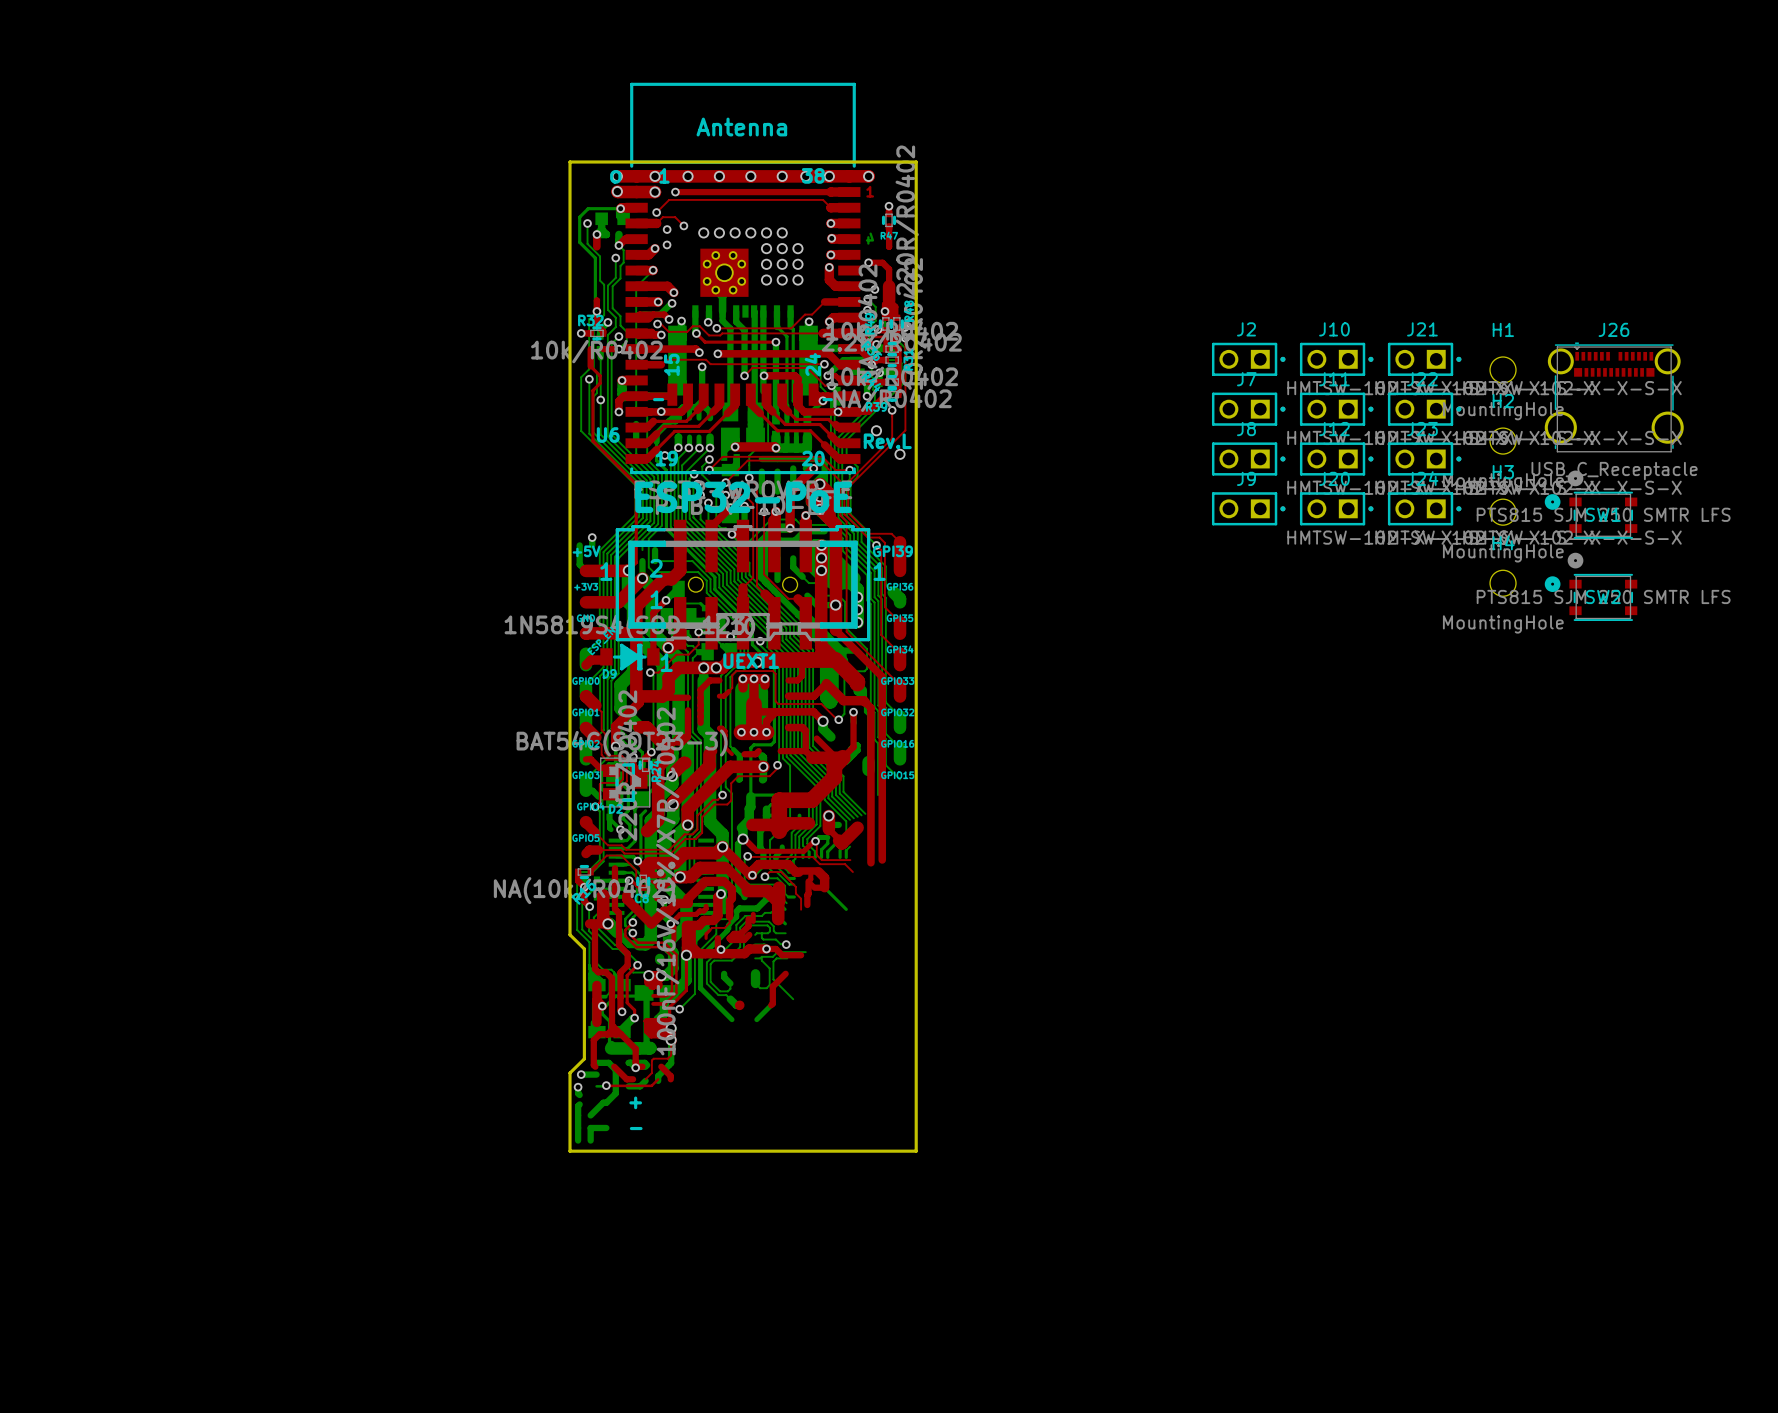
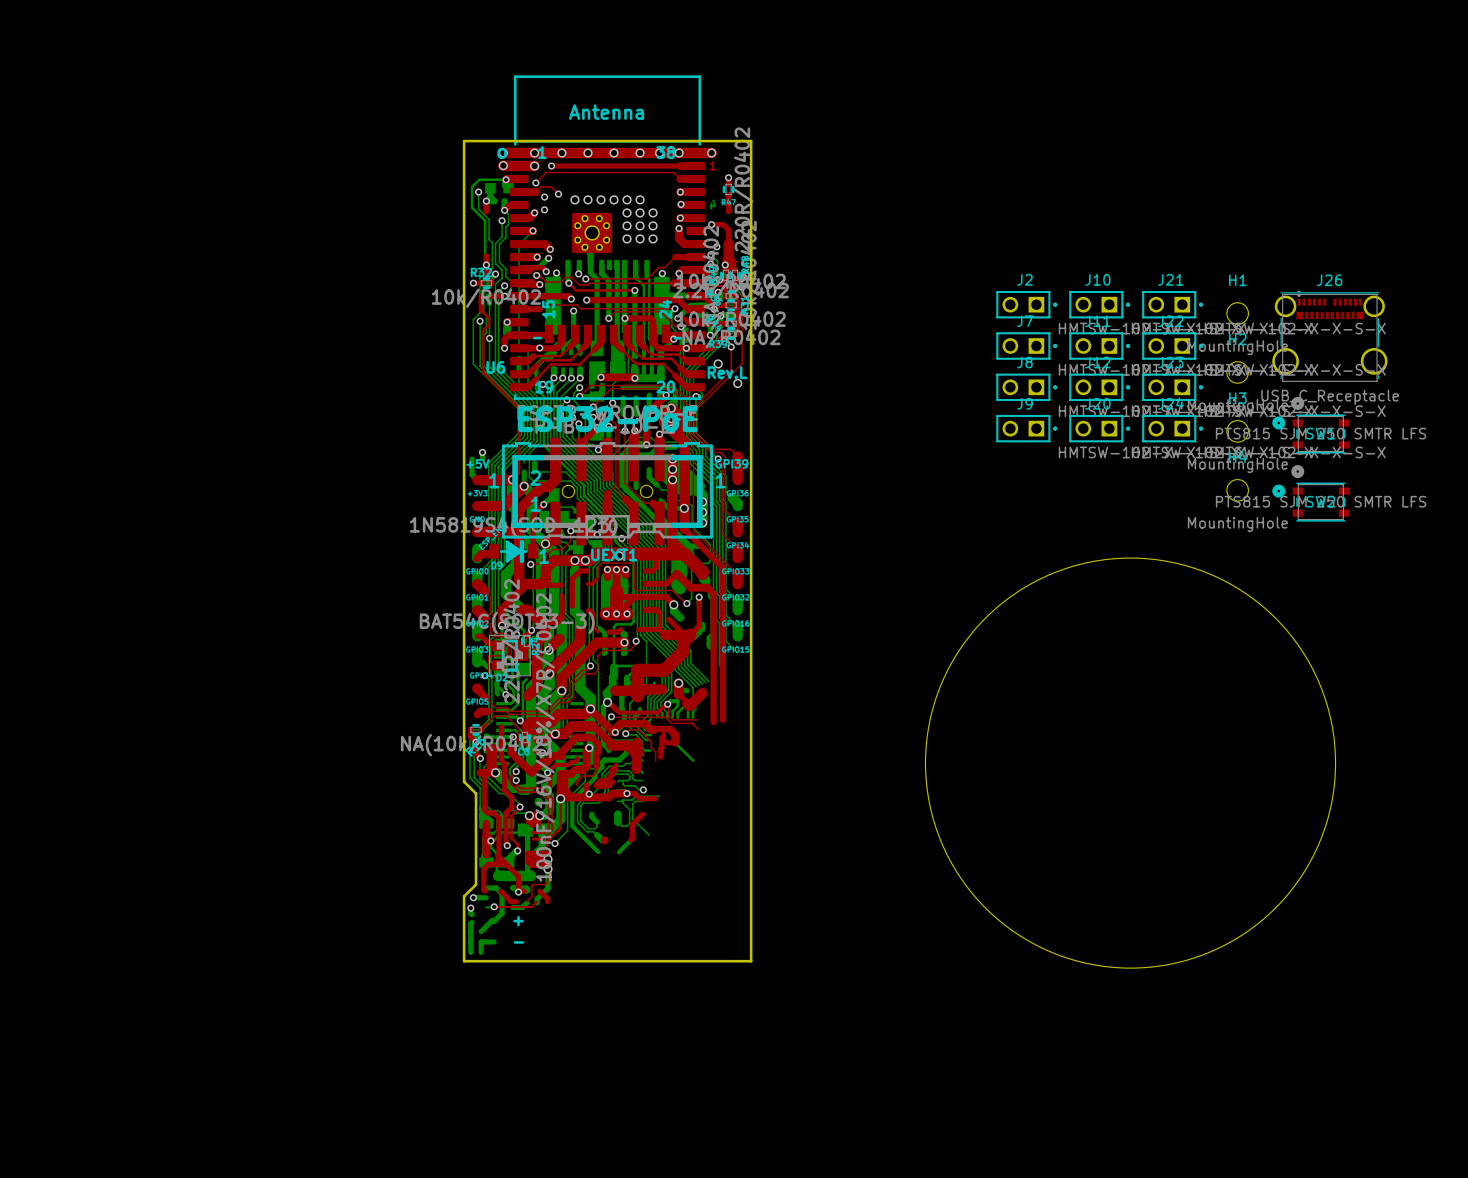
round board edge: none -> [925, 557, 1336, 969]

